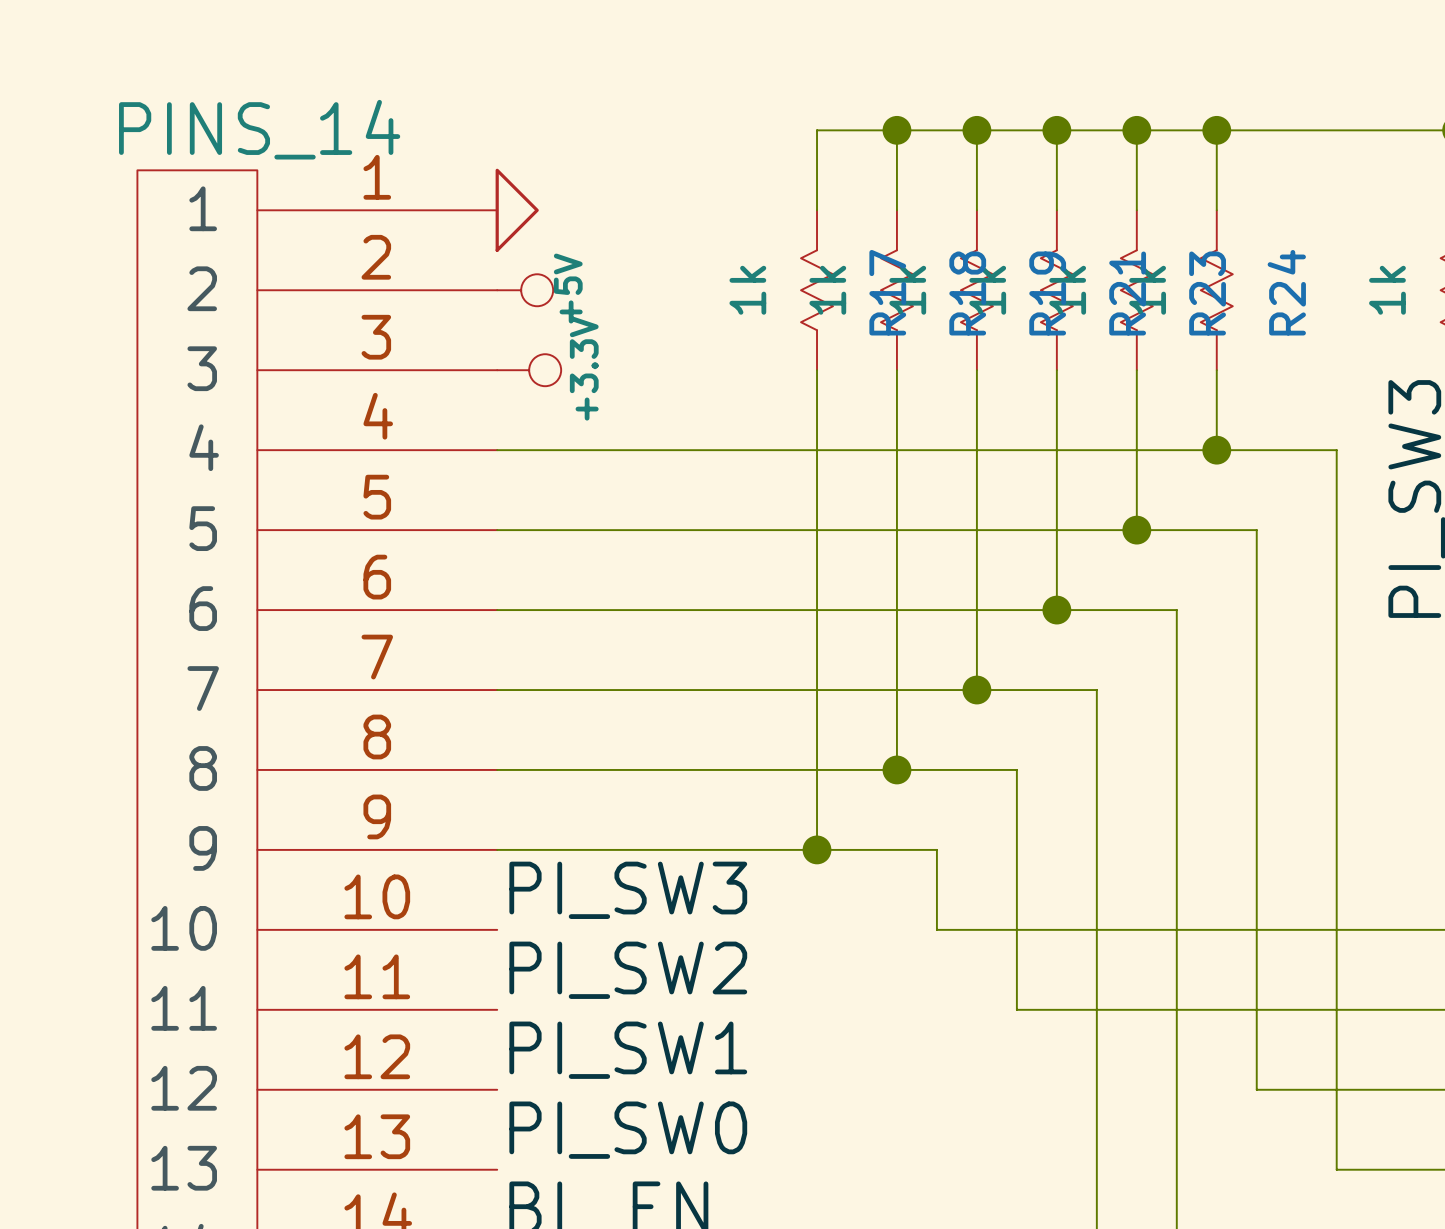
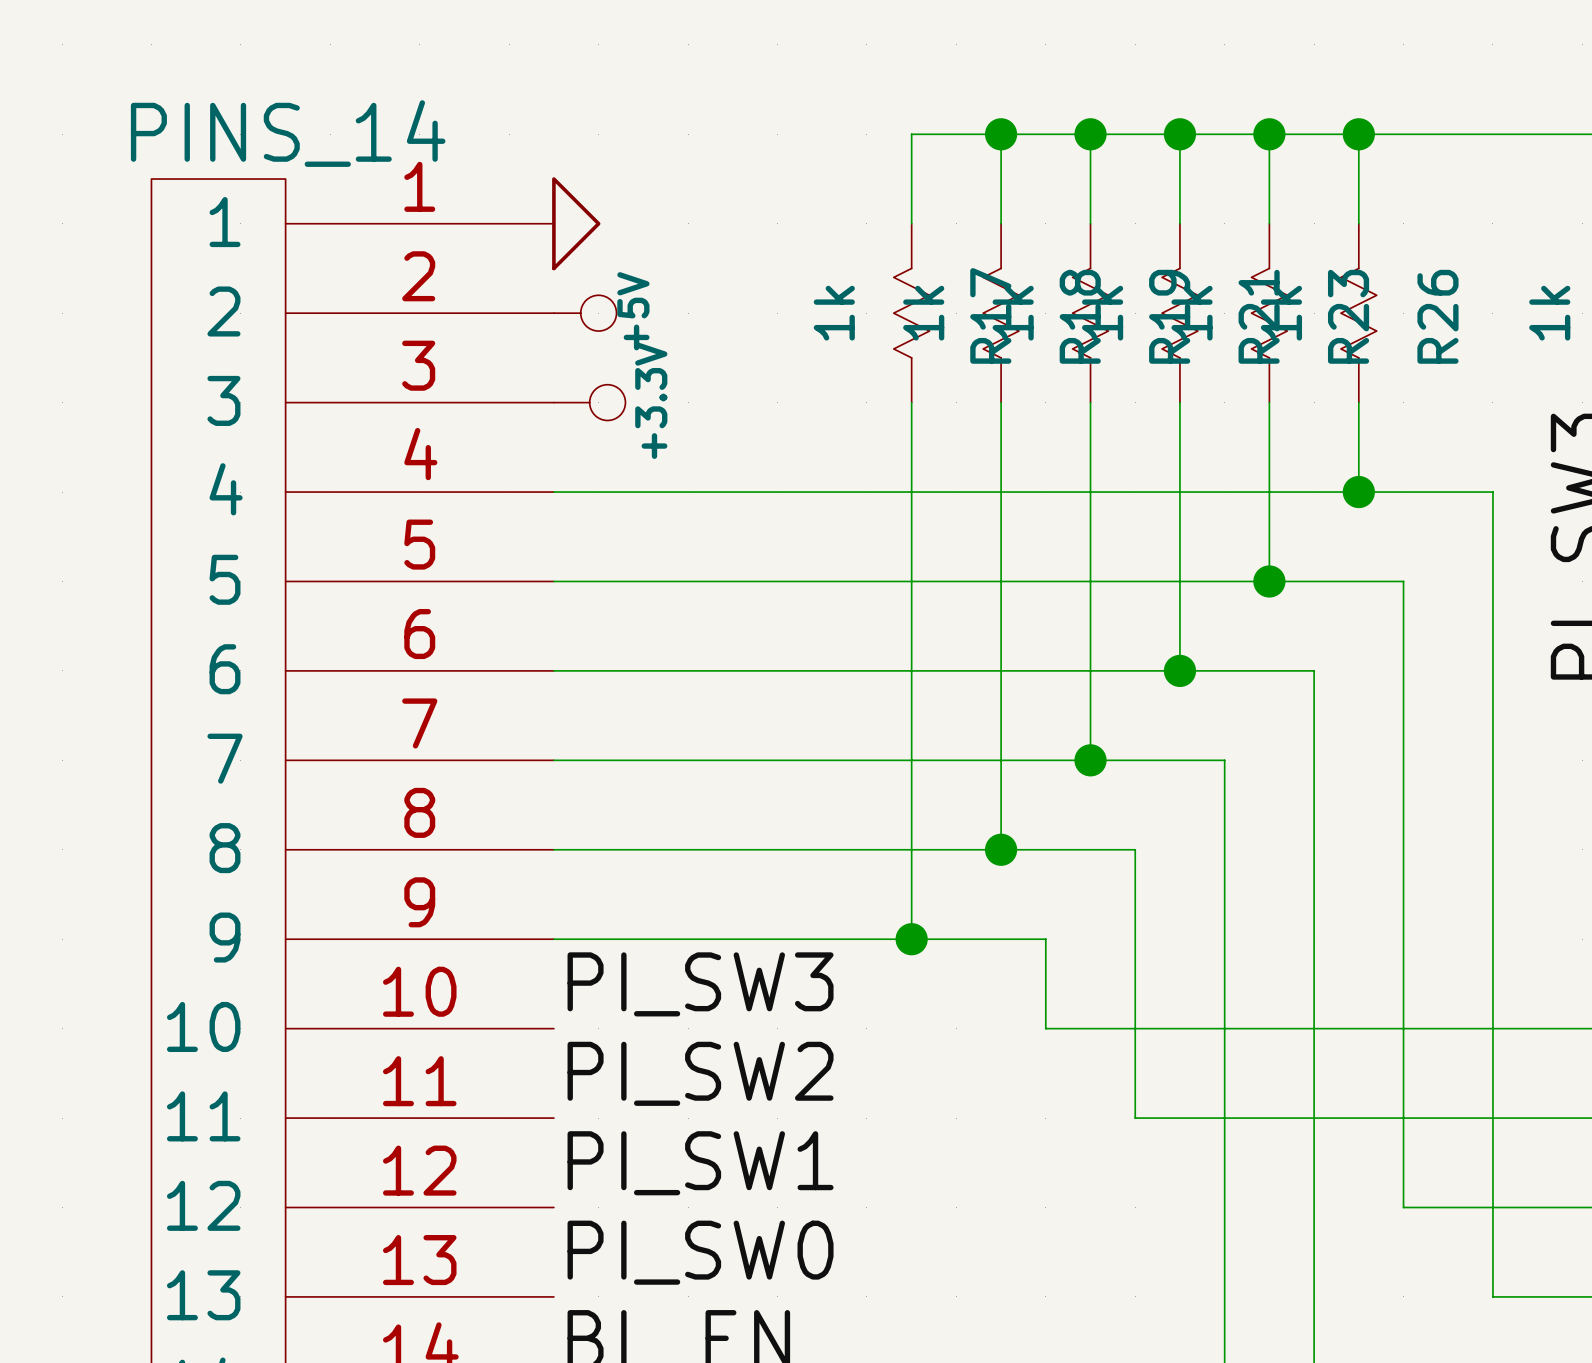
R24 name: R24 (1286, 292) -> R26 (1437, 316)

